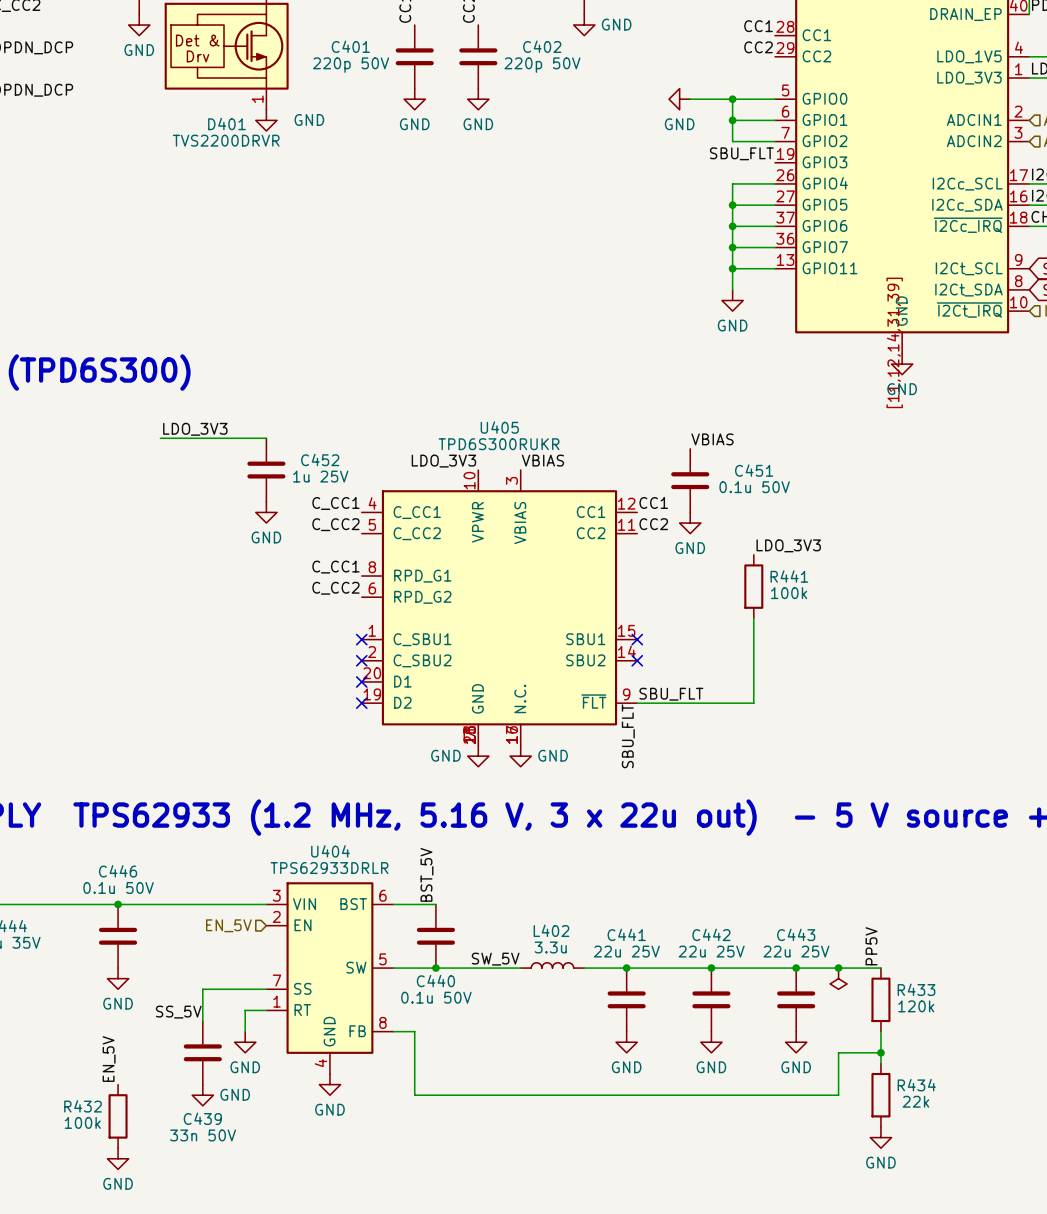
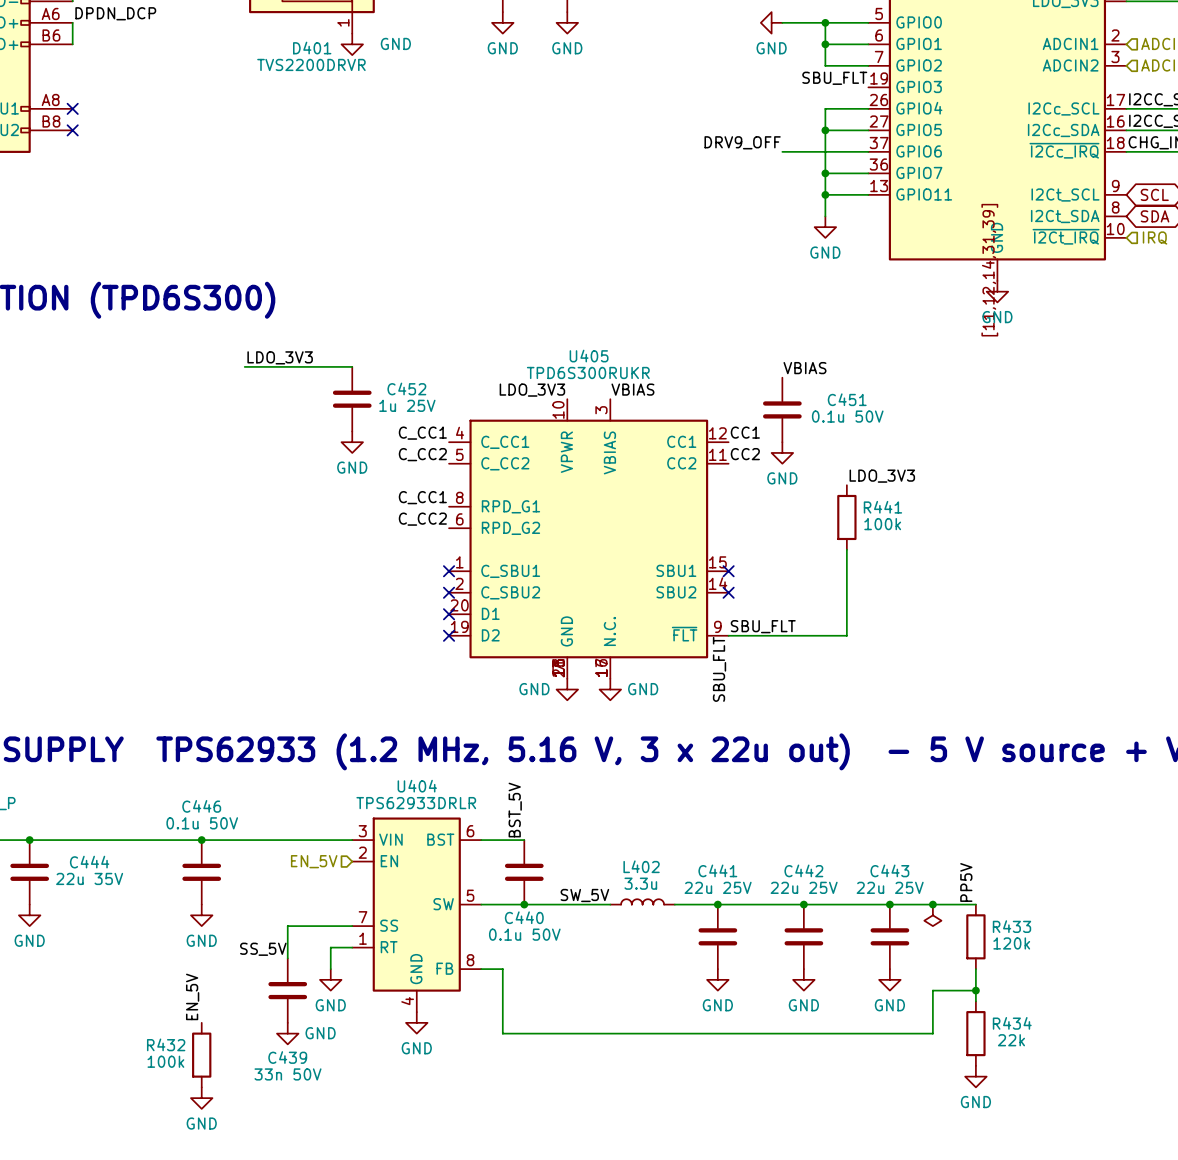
label: none -> DRV9_OFF (742, 142)
wire: none -> (782, 151) (825, 151)
junction: (732, 226) -> none

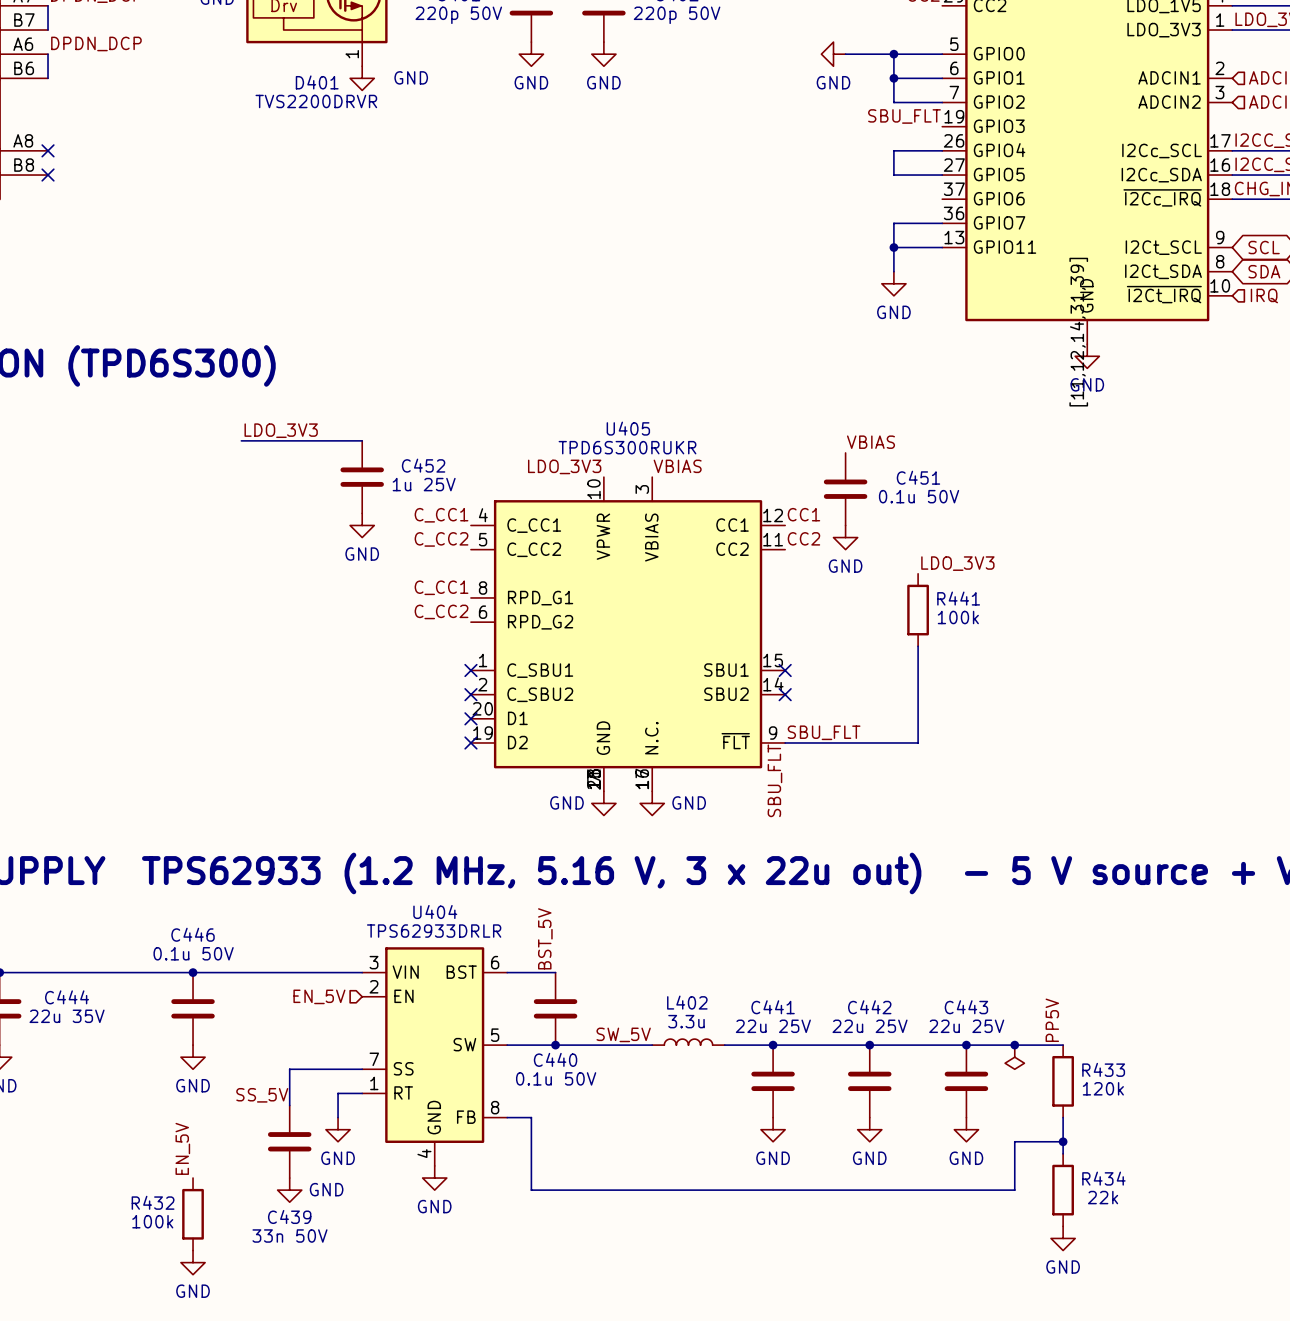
wire: (825, 130) (825, 173) -> none
junction: (825, 130) -> none
label: DRV9_OFF (742, 142) -> none
wire: (782, 151) (868, 151) -> none
junction: (825, 173) -> none

